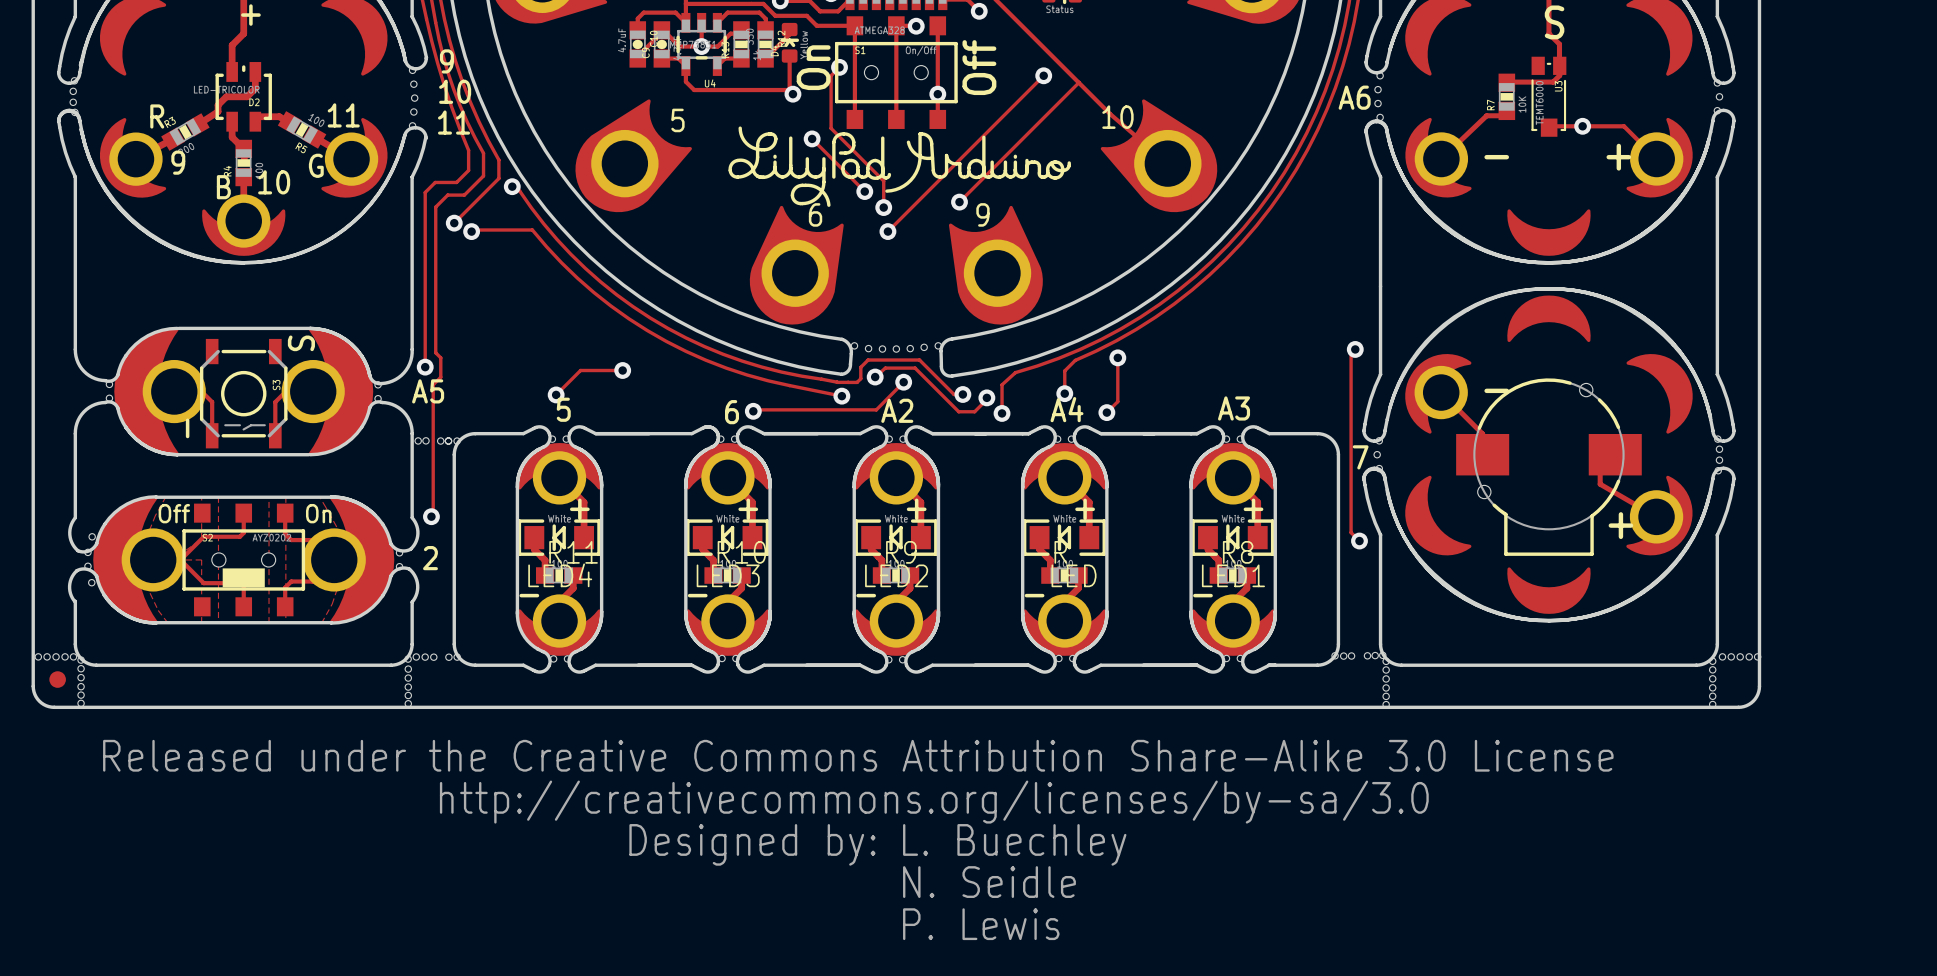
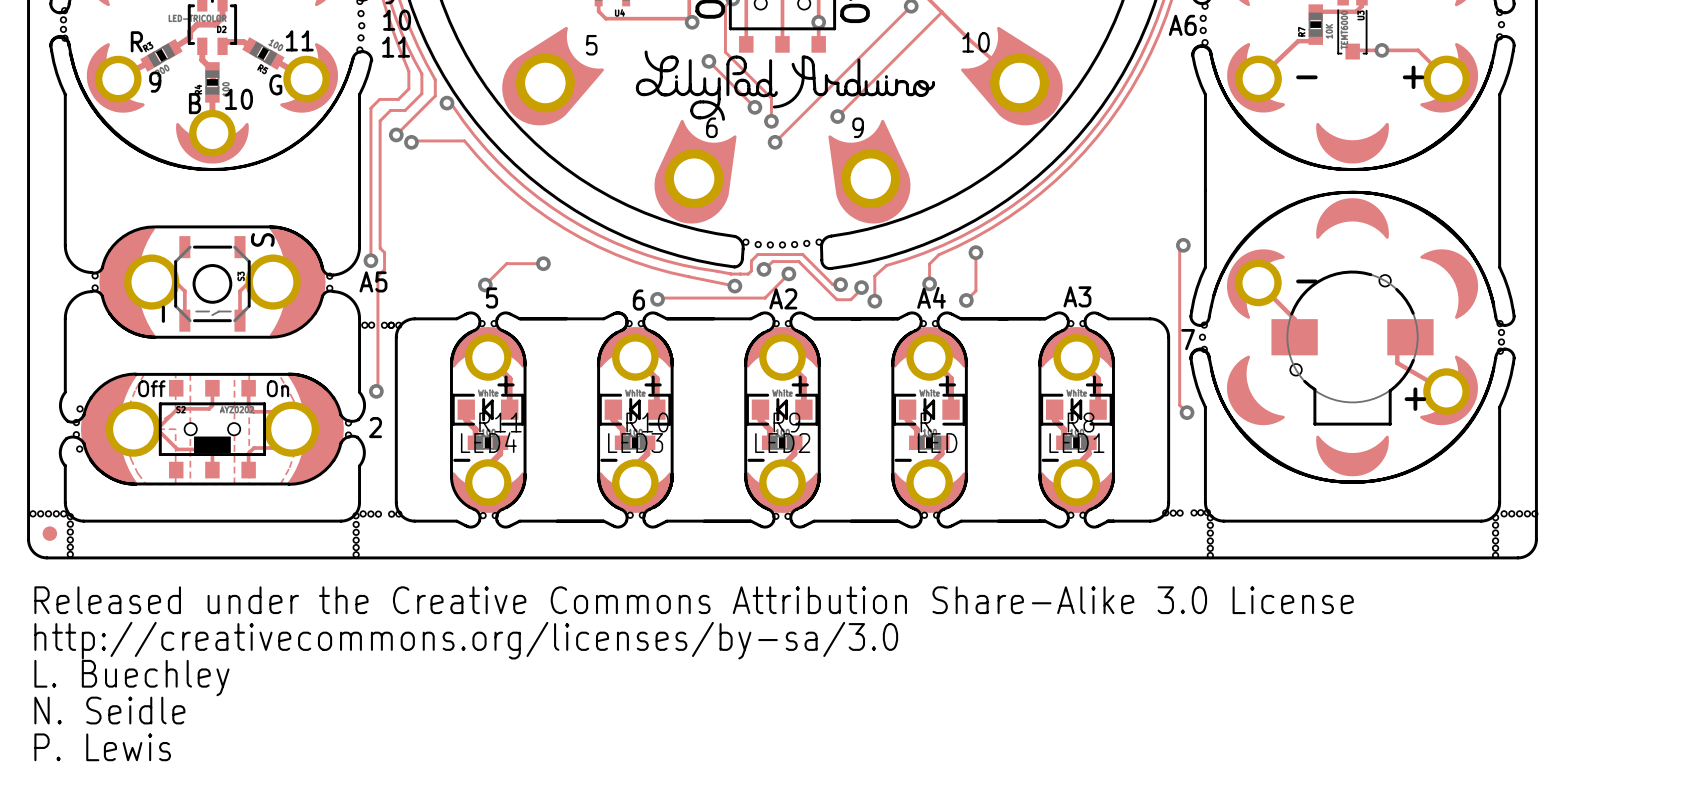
drawing: [103, 739, 1614, 866] -> none
text: none -> Released under the Creative Commons Attribution Share-Alike 3.0 License (694, 600)
text: none -> http://creativecommons.org/licenses/by-sa/3.0 (466, 640)
text: none -> L. Buechley (131, 678)
text: L. Buechley (1014, 844) -> none
text: none -> N. Seidle (109, 710)
text: N. Seidle (989, 882) -> none
text: none -> P. Lewis (102, 747)
text: P. Lewis (981, 924) -> none

